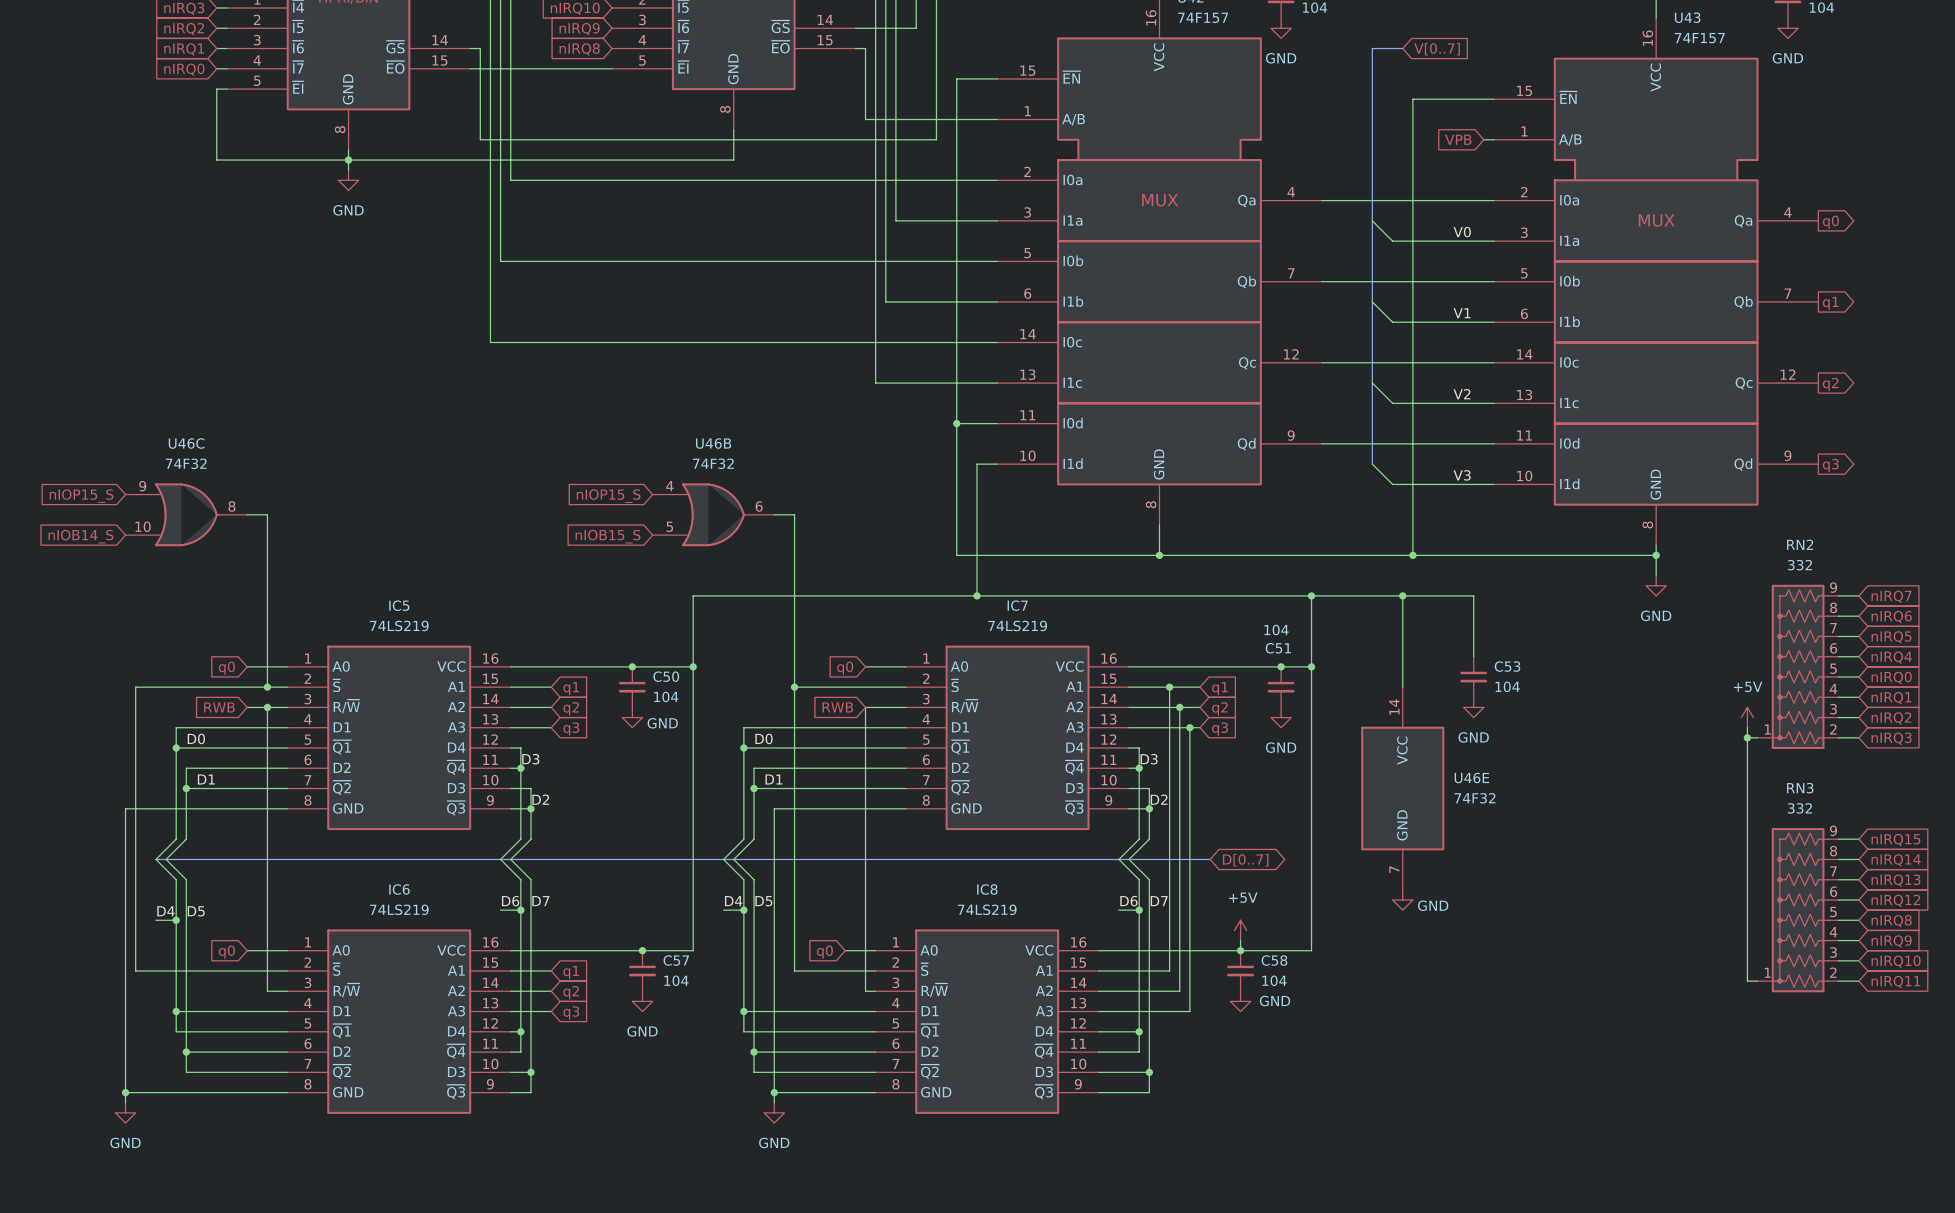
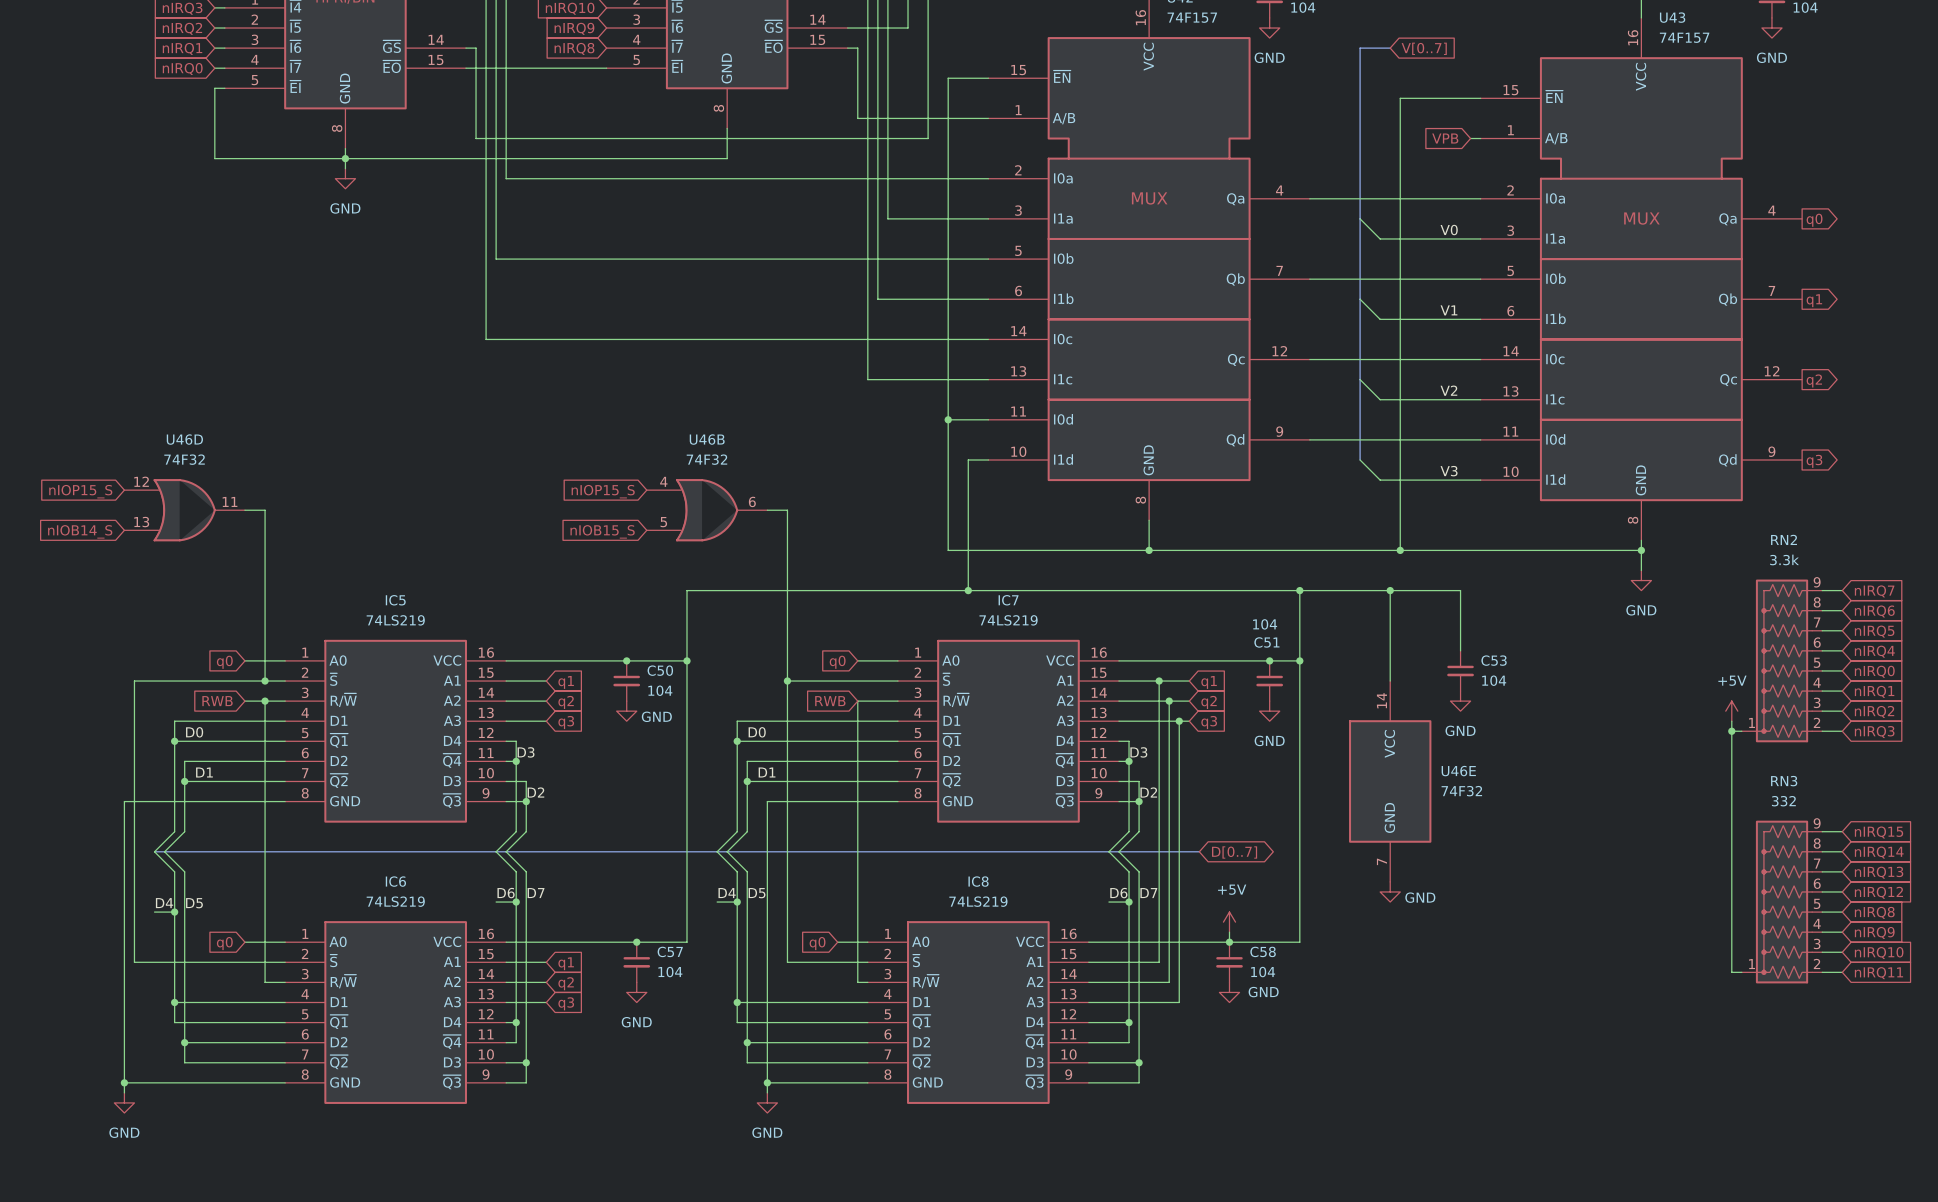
U46C name: U46C (186, 443) -> U46D (184, 439)
U46C pin number: 9 (142, 486) -> 12 (141, 481)
U46C pin number: 8 (231, 506) -> 11 (230, 501)
U46C pin number: 10 (143, 526) -> 13 (141, 522)
RN2 value: 332 (1799, 565) -> 3.3k (1784, 559)

